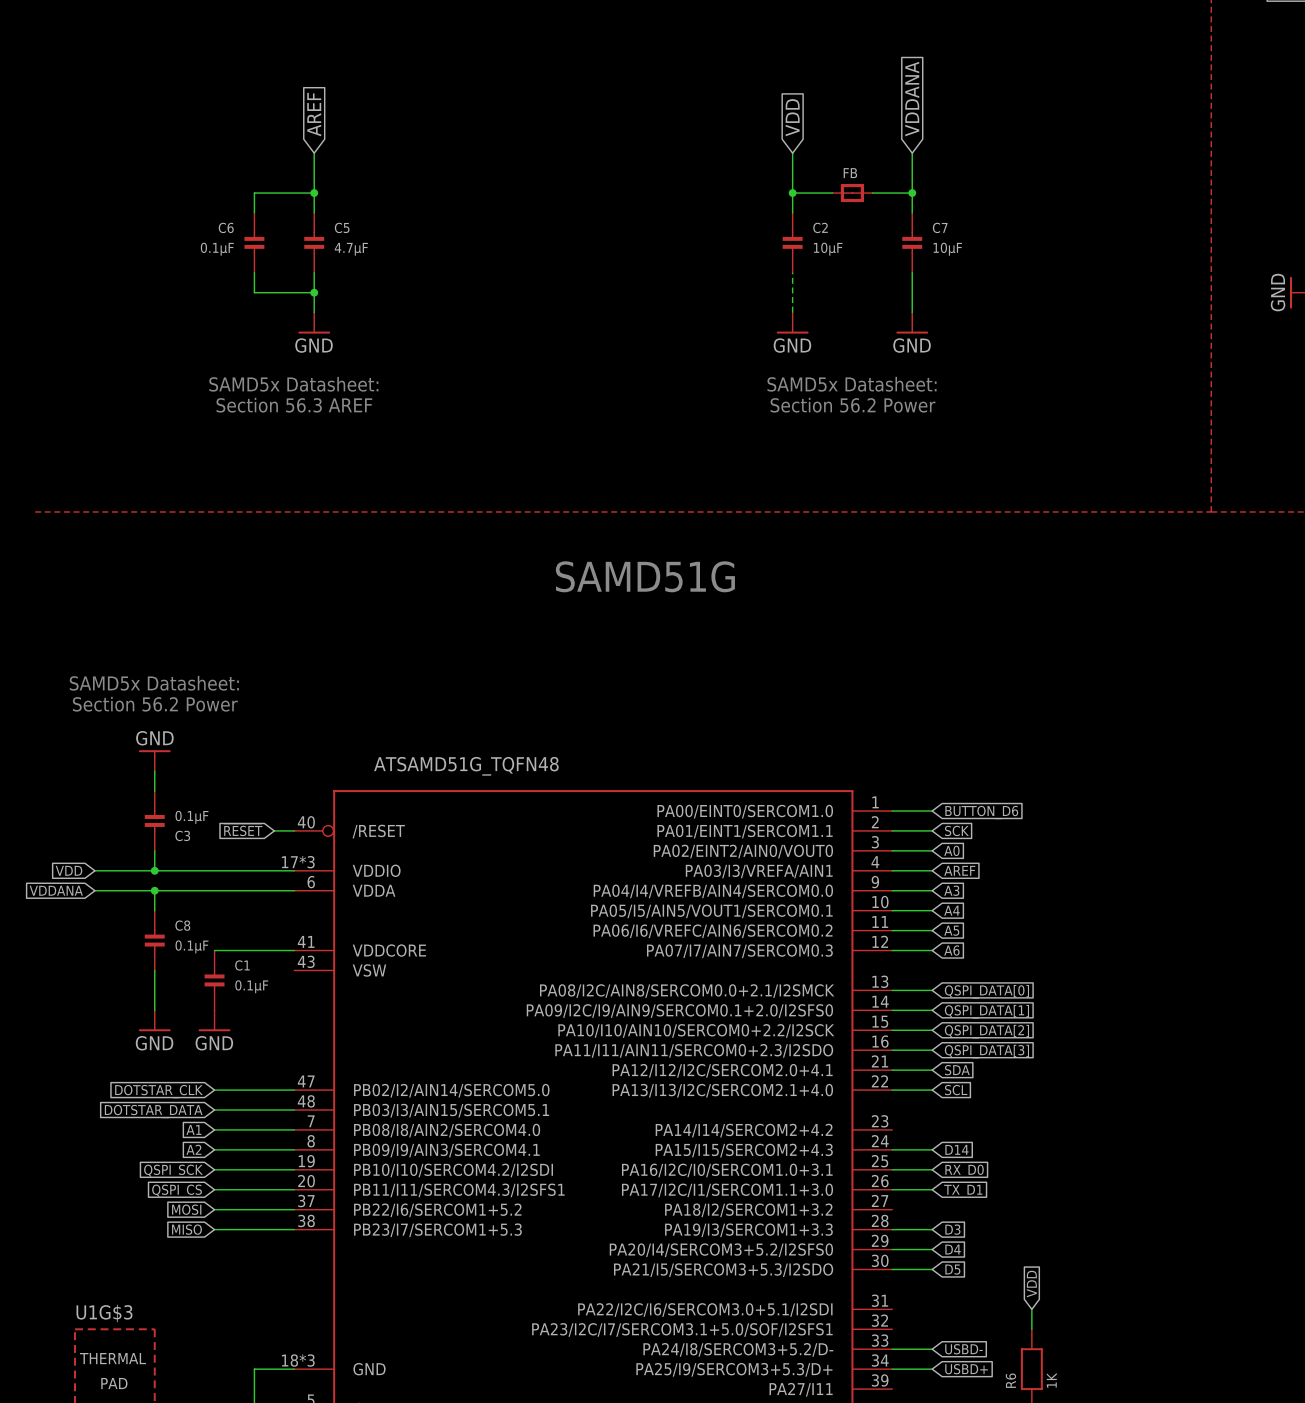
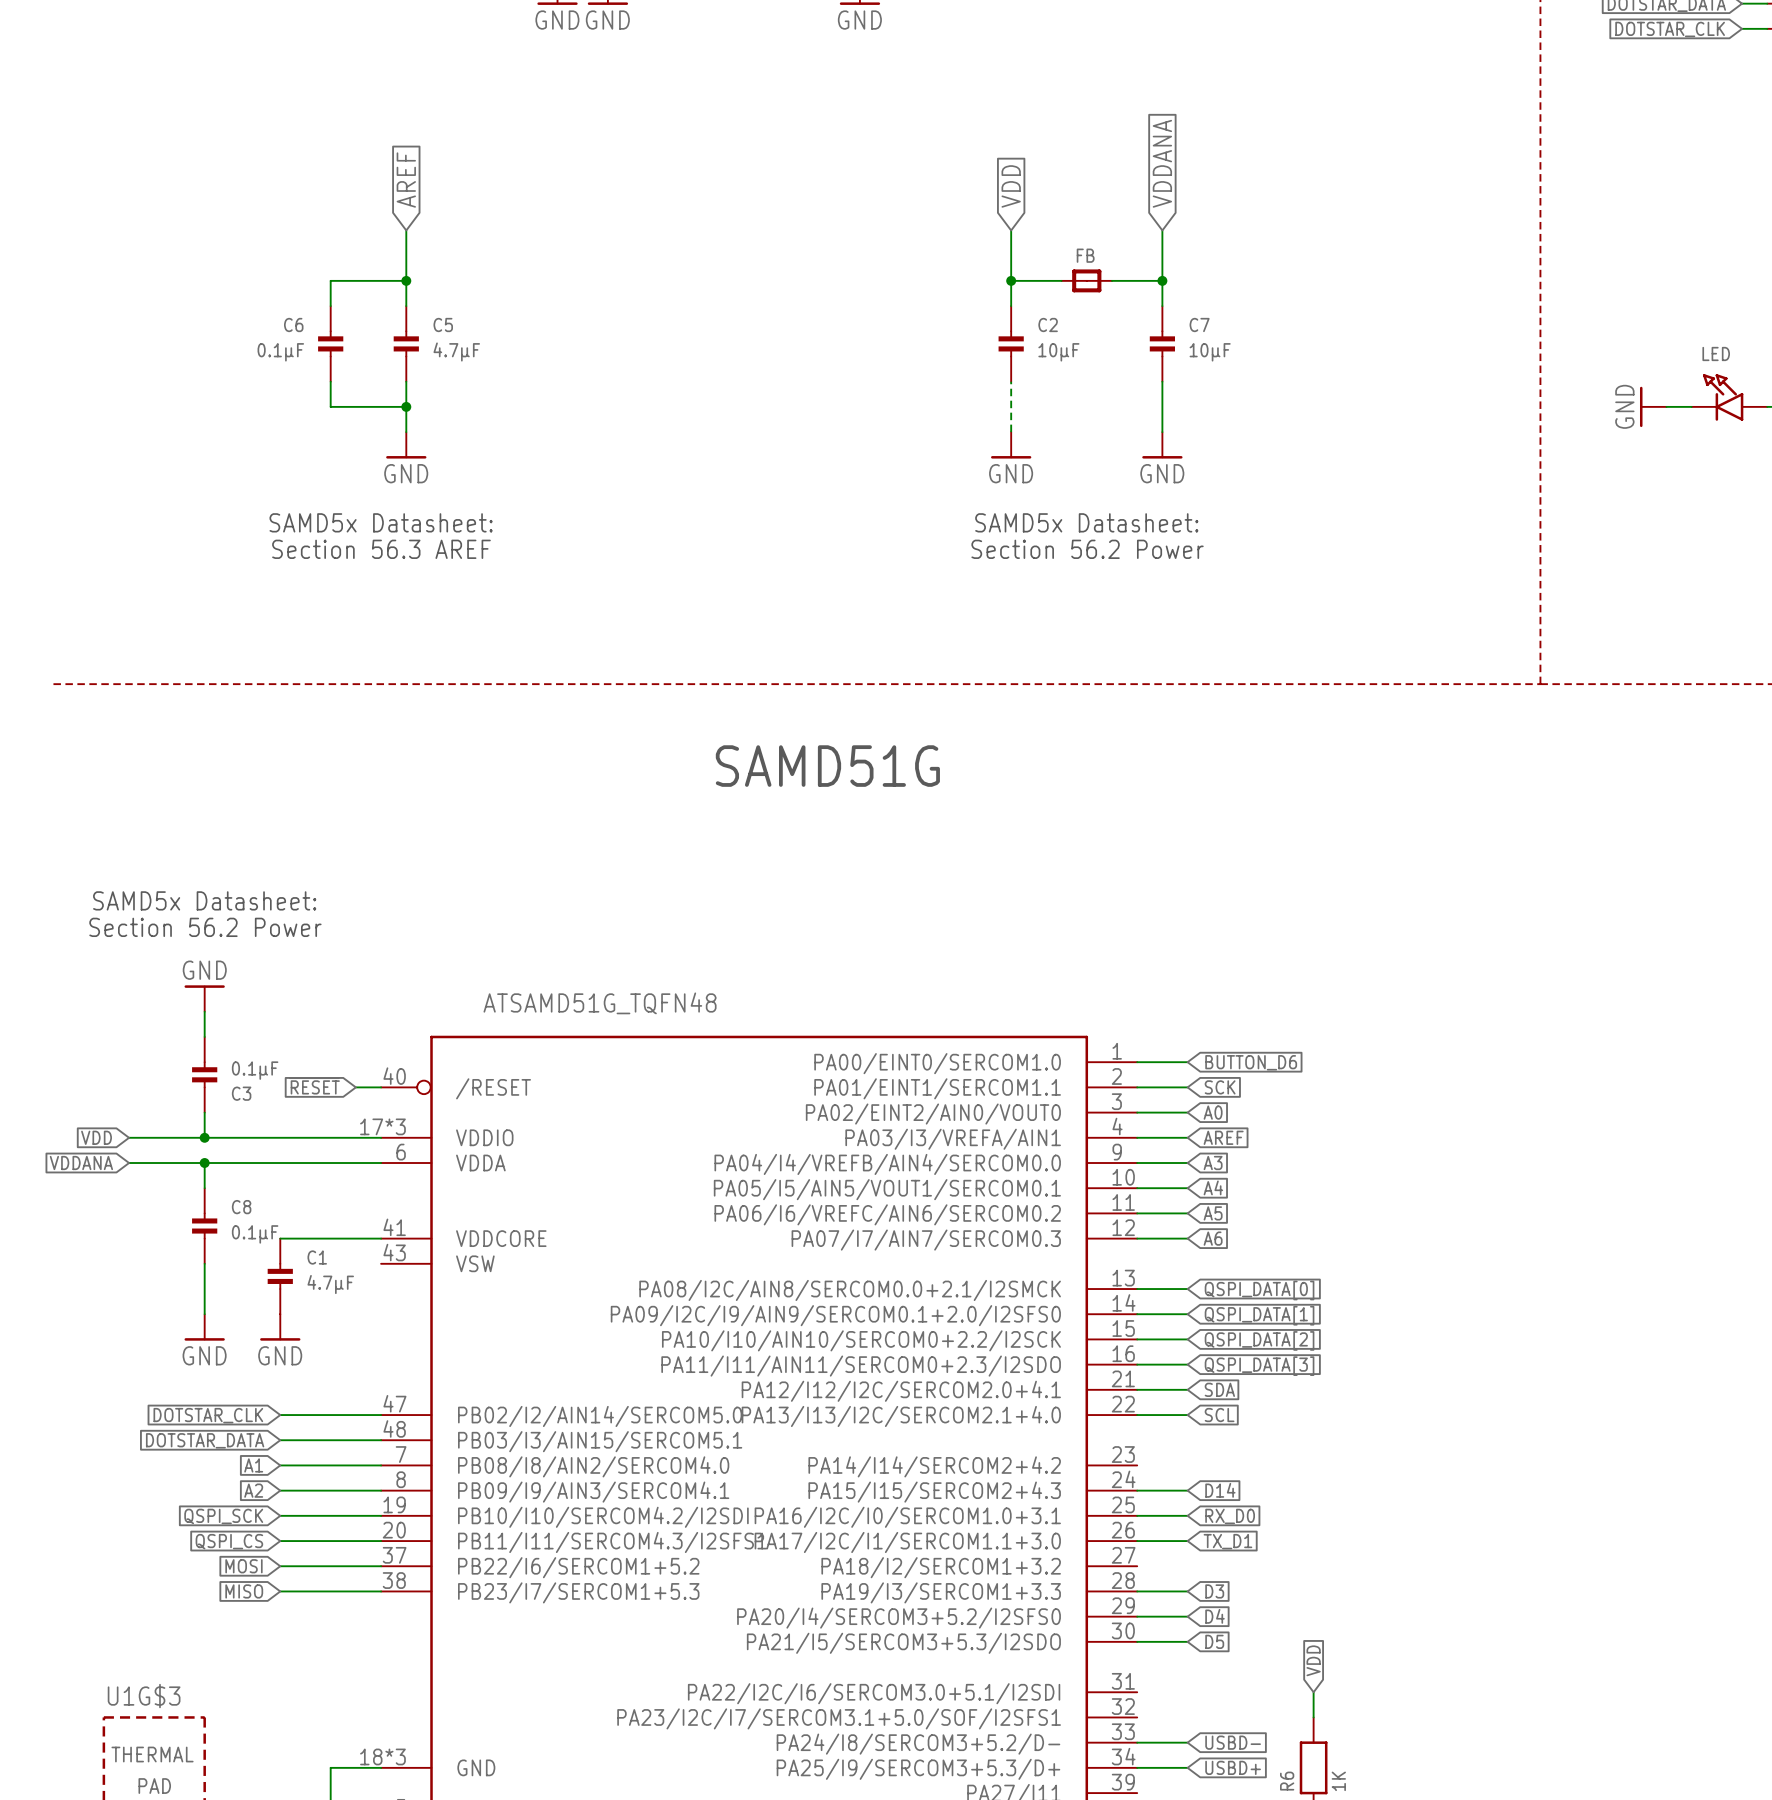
C1 value: 0.1µF (251, 986) -> 4.7µF (330, 1284)

